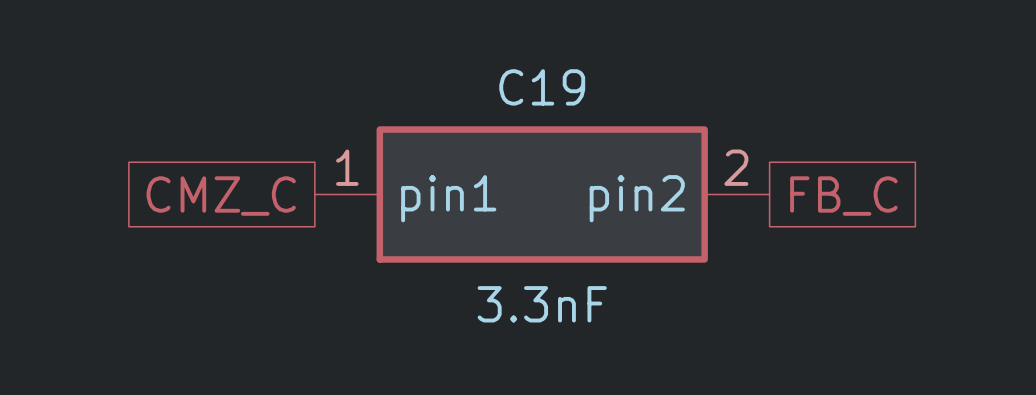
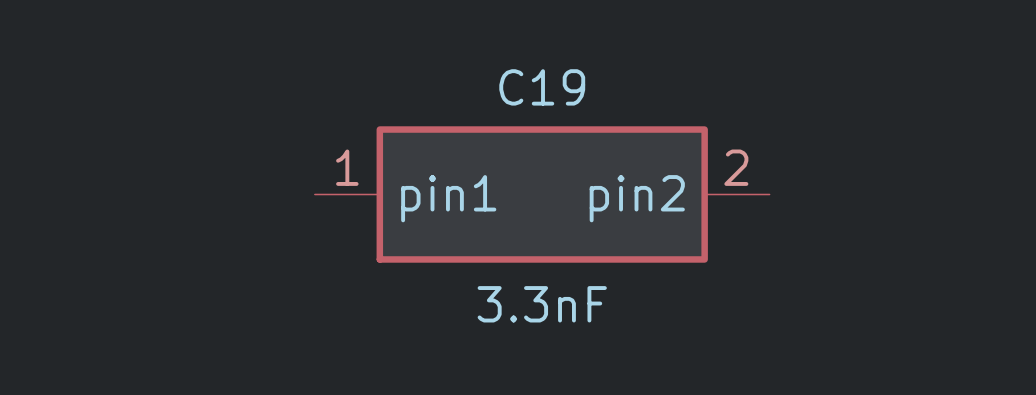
global label: CMZ_C (221, 196) -> none
global label: FB_C (843, 196) -> none

